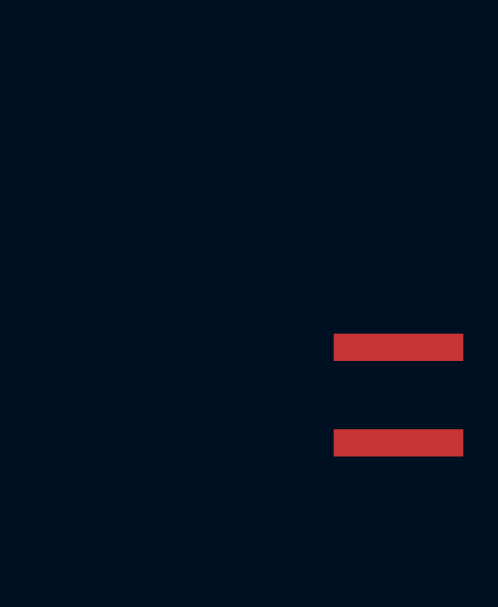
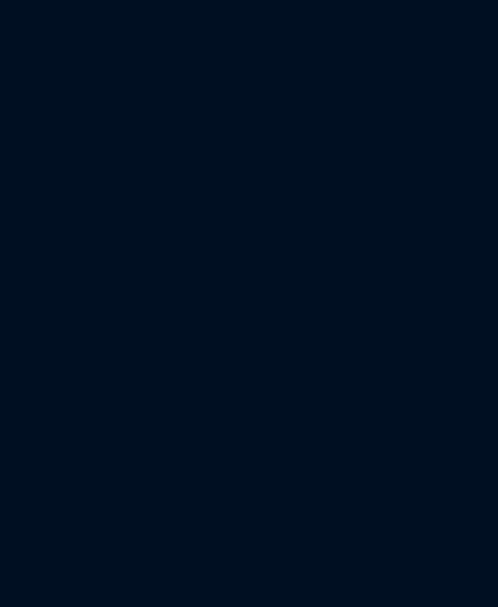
part: (398, 395) -> none

